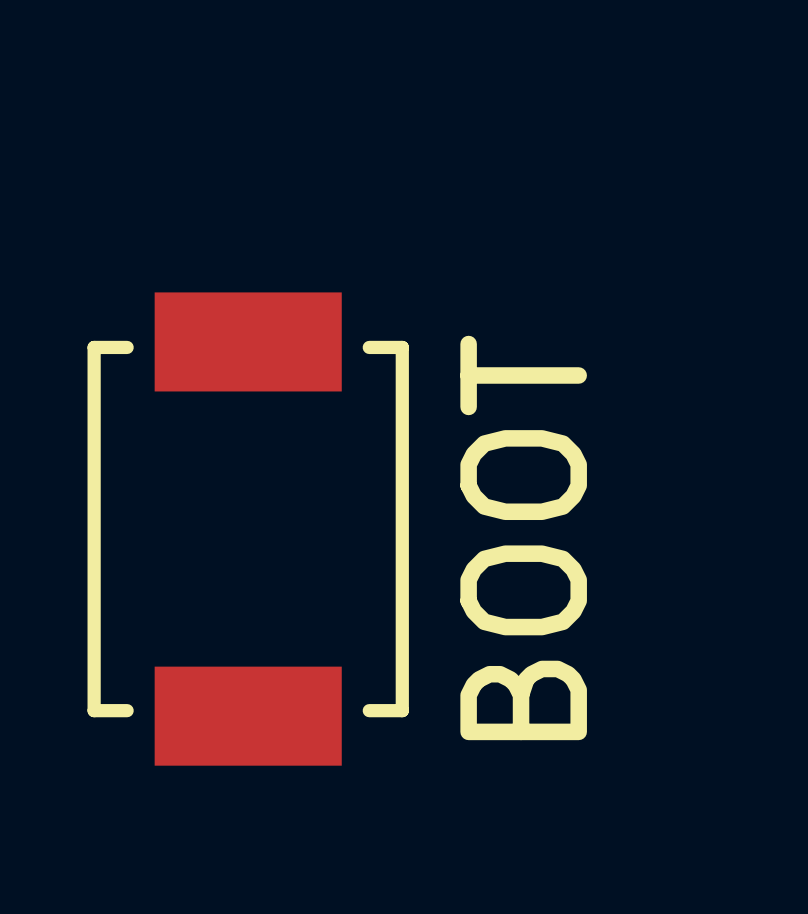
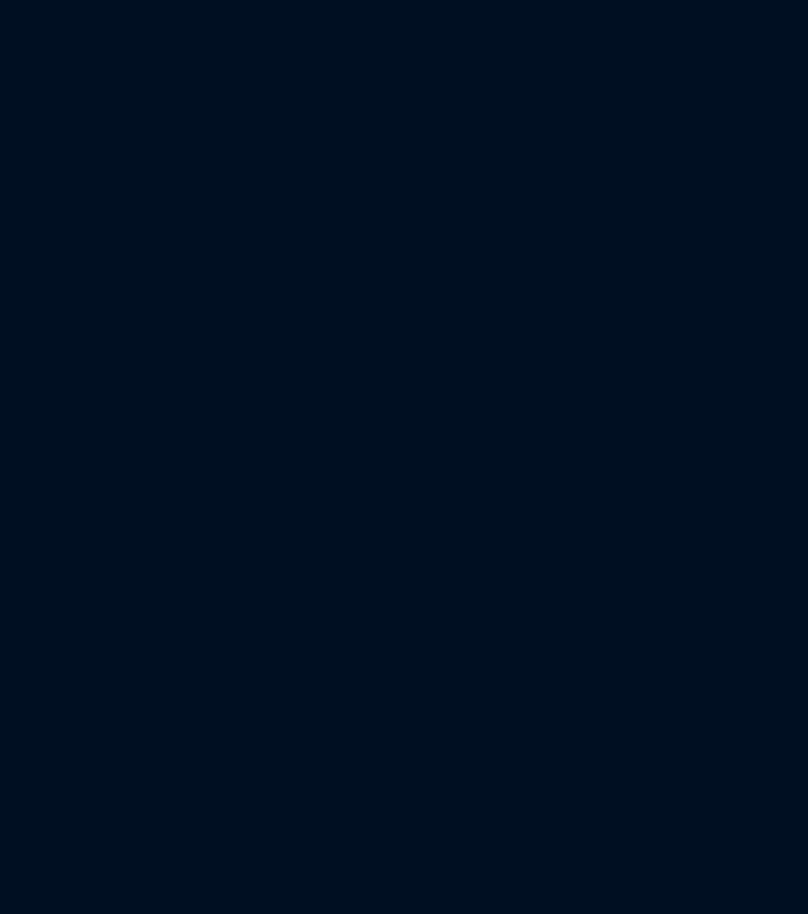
part: (248, 529) -> none
text: BOOT (523, 537) -> none

